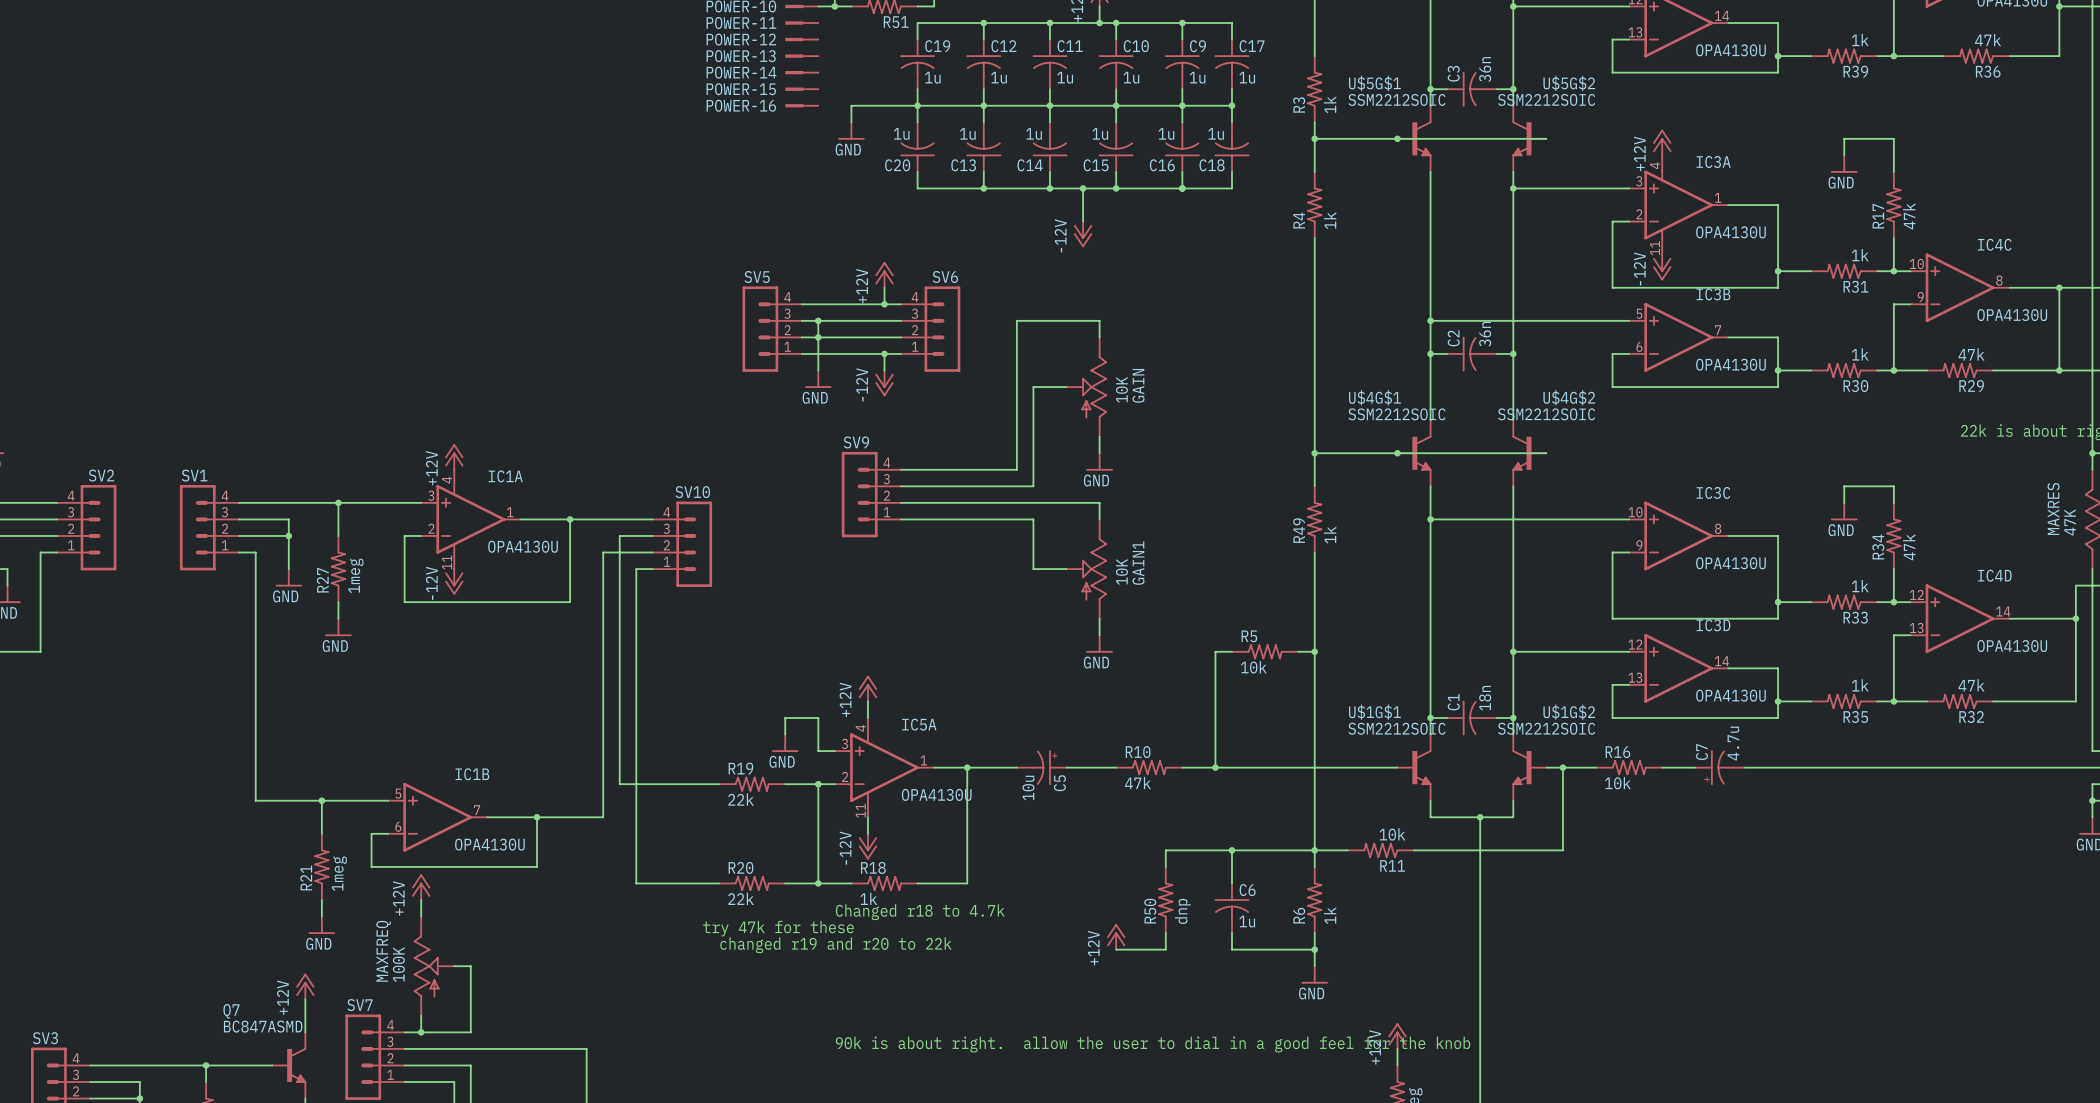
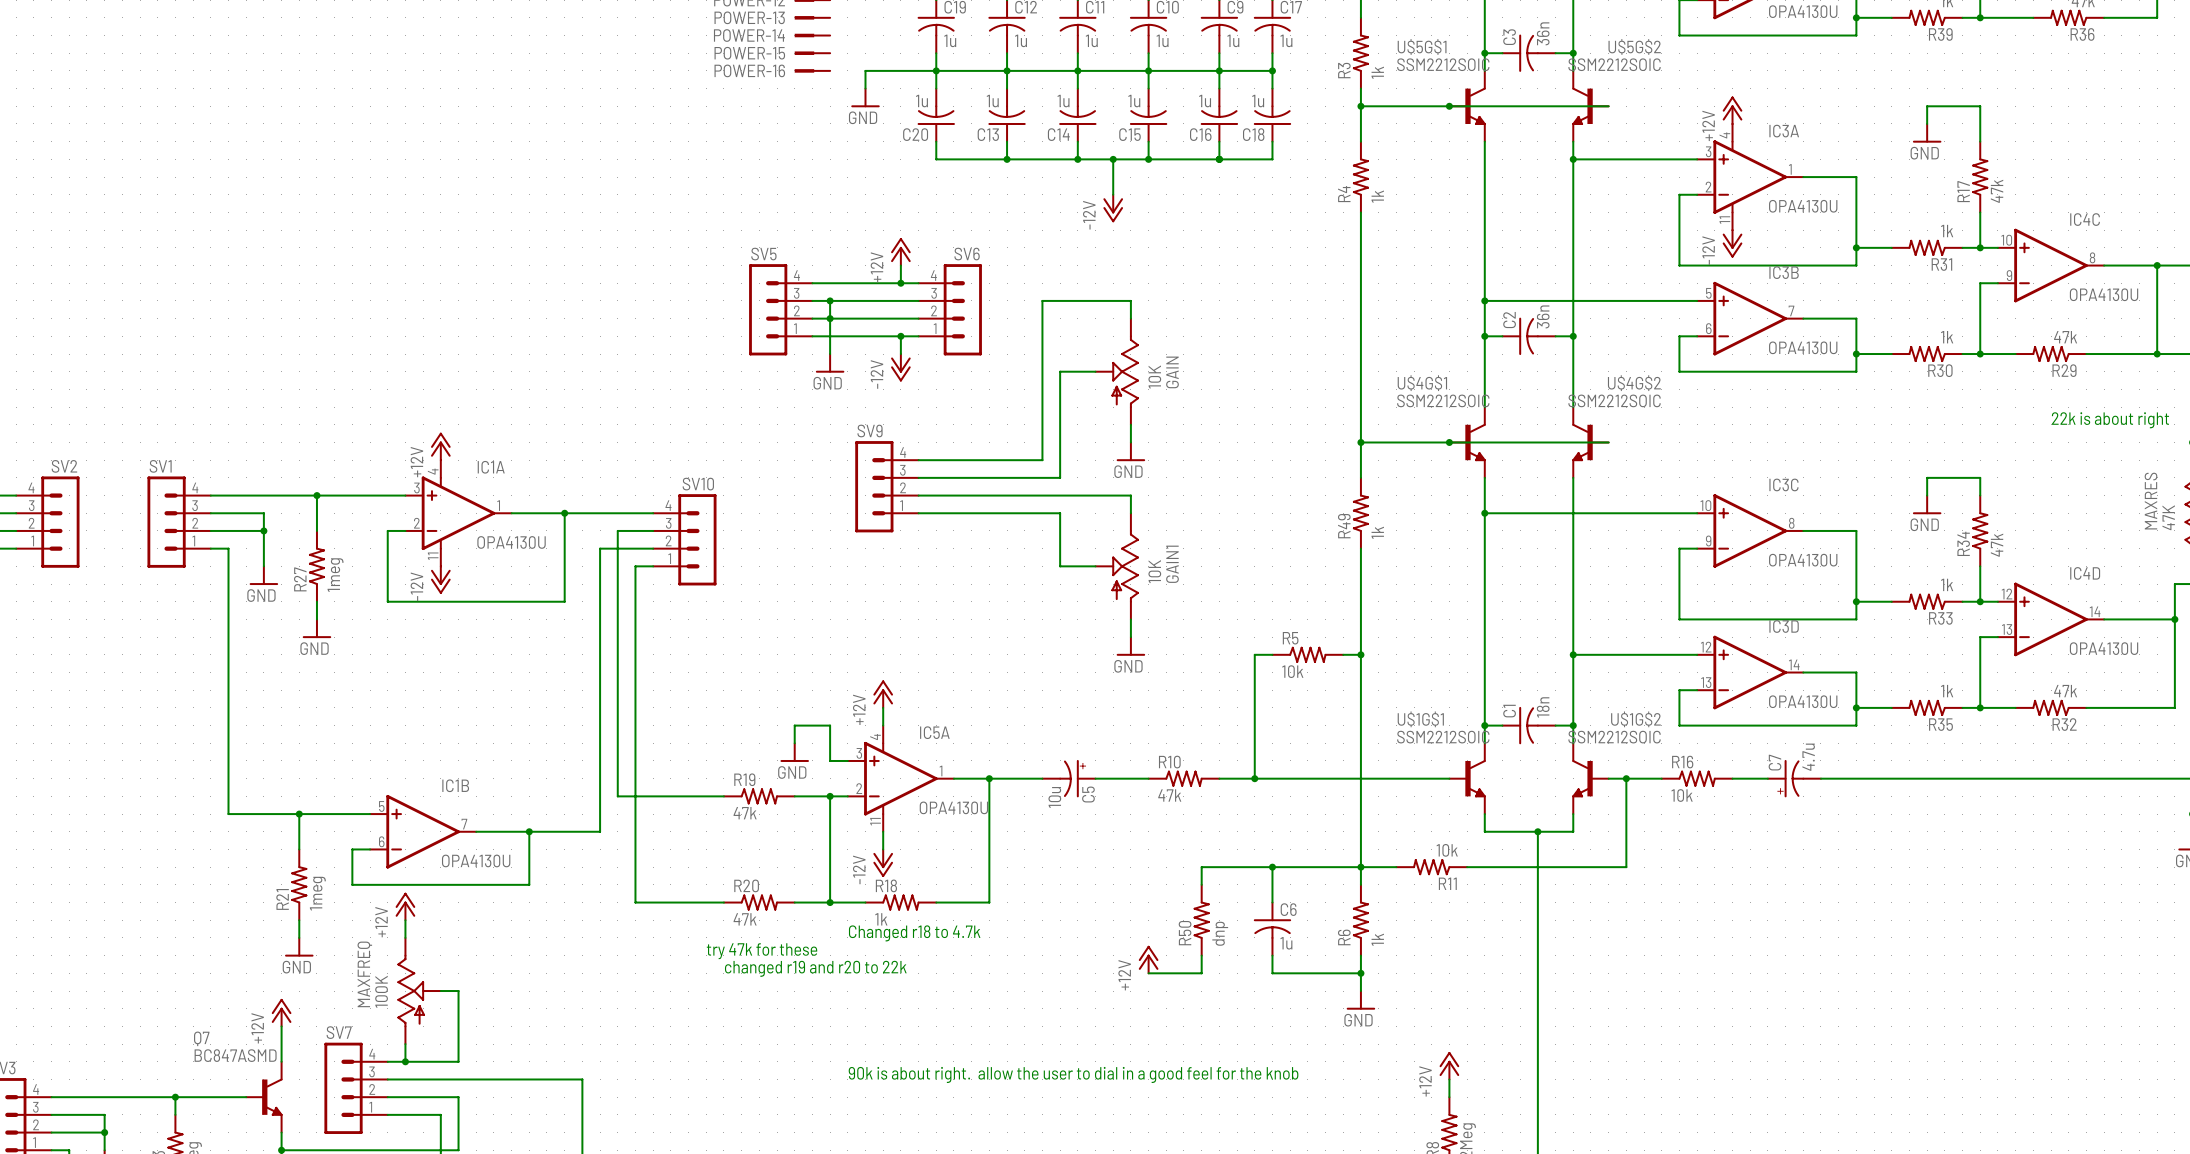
R19 value: 22k (741, 799) -> 47k (745, 813)
R20 value: 22k (741, 898) -> 47k (745, 919)

